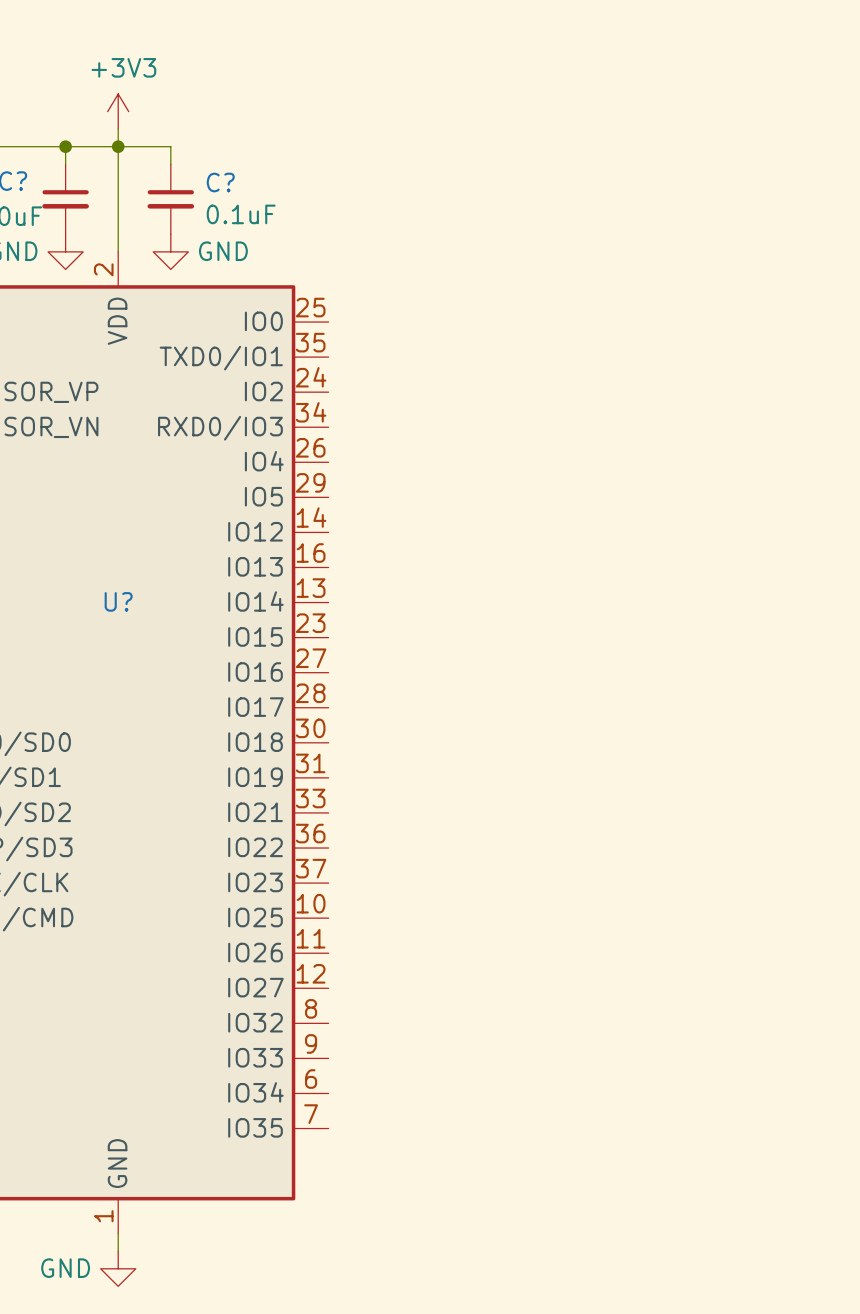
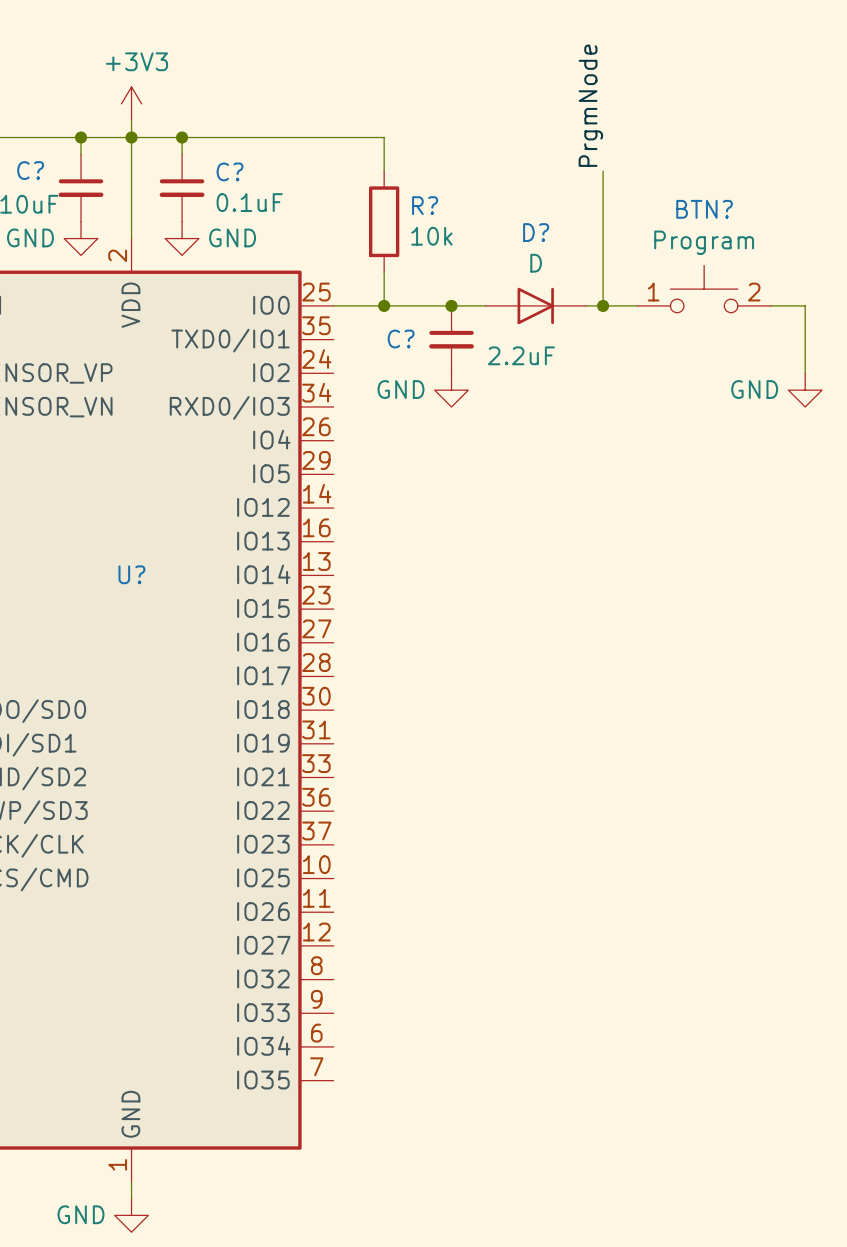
label: none -> PrgmNode (590, 105)
wire: none -> (182, 137) (384, 137) (384, 171)
junction: none -> (182, 137)
wire: none -> (603, 171) (603, 305)
R?: none -> 10k (384, 221)
wire: none -> (384, 272) (384, 305)
BTN?: none -> Program (704, 289)
wire: none -> (333, 305) (485, 305)
junction: none -> (384, 305)
junction: none -> (451, 305)
D?: none -> D (535, 305)
wire: none -> (586, 305) (636, 305)
junction: none -> (603, 305)
wire: none -> (771, 305) (805, 305) (805, 373)
C?: none -> 2.2uF (451, 339)
power symbol: none -> GND (451, 390)
power symbol: none -> GND (805, 390)

